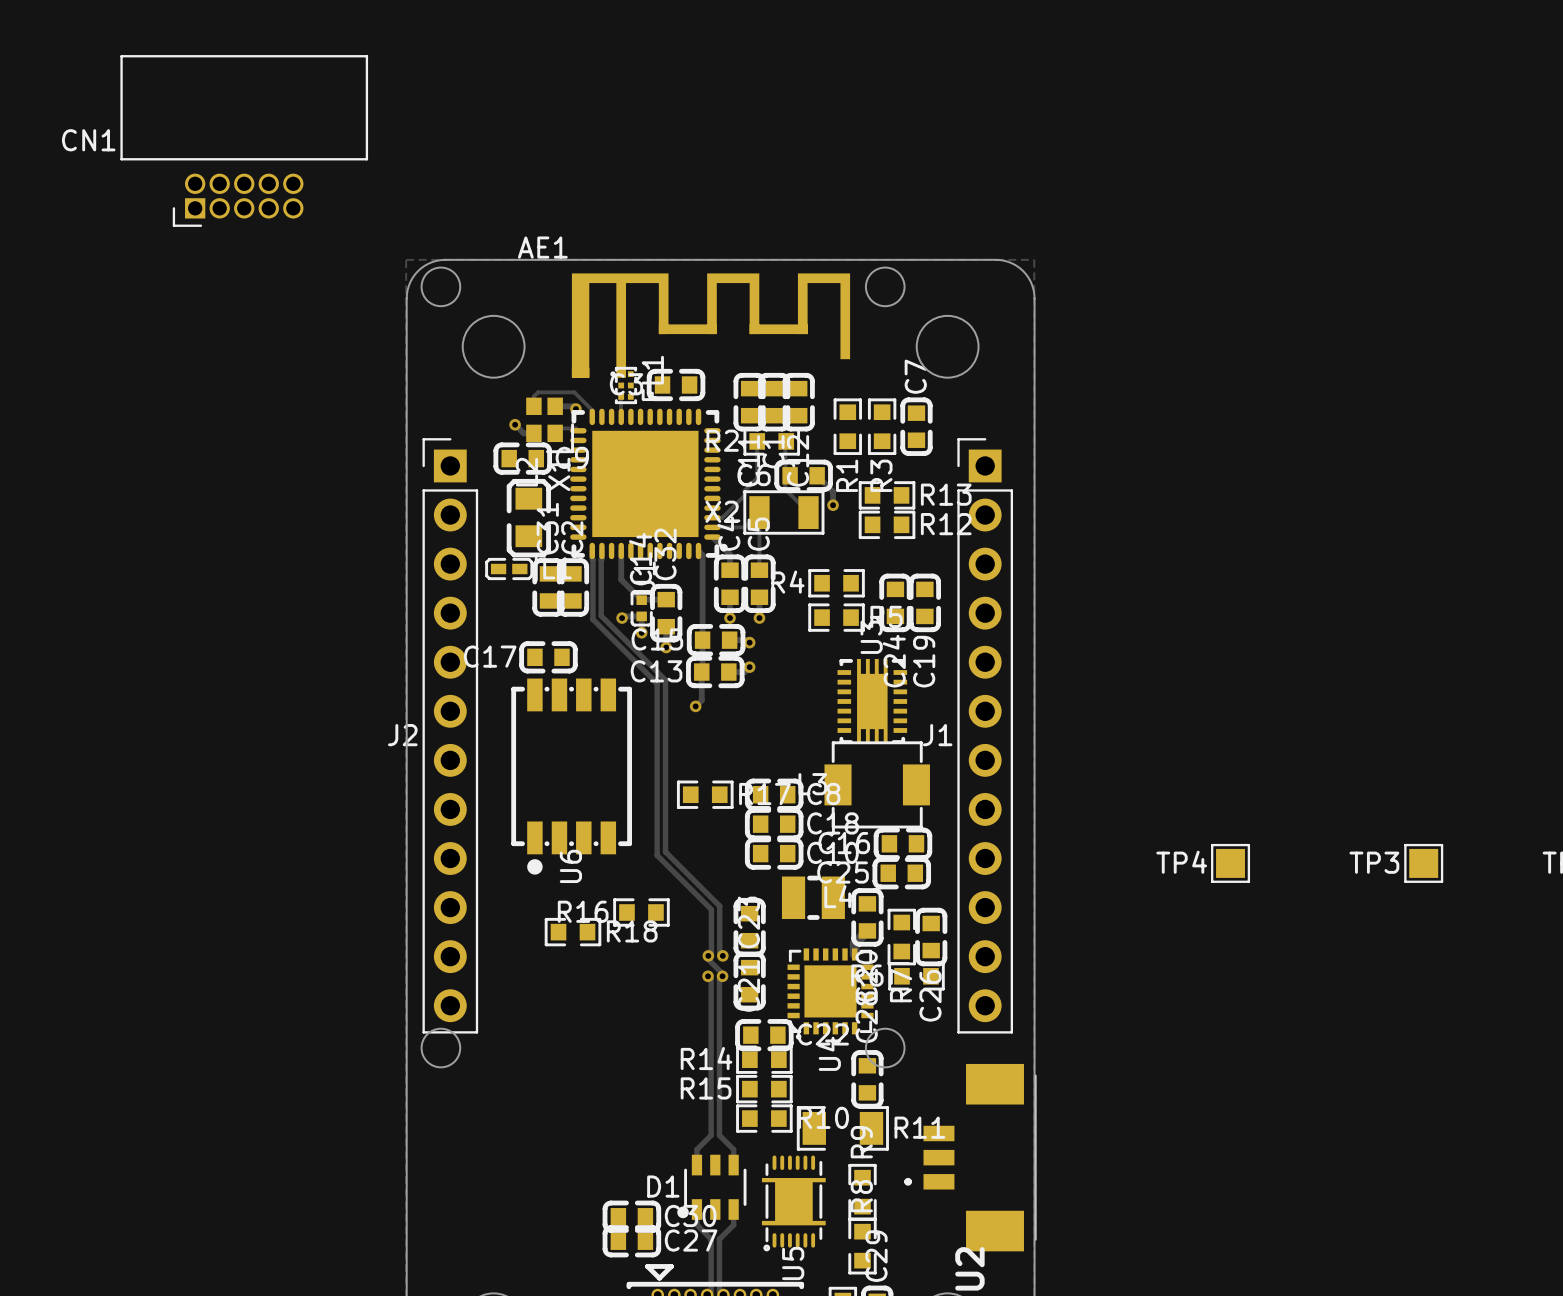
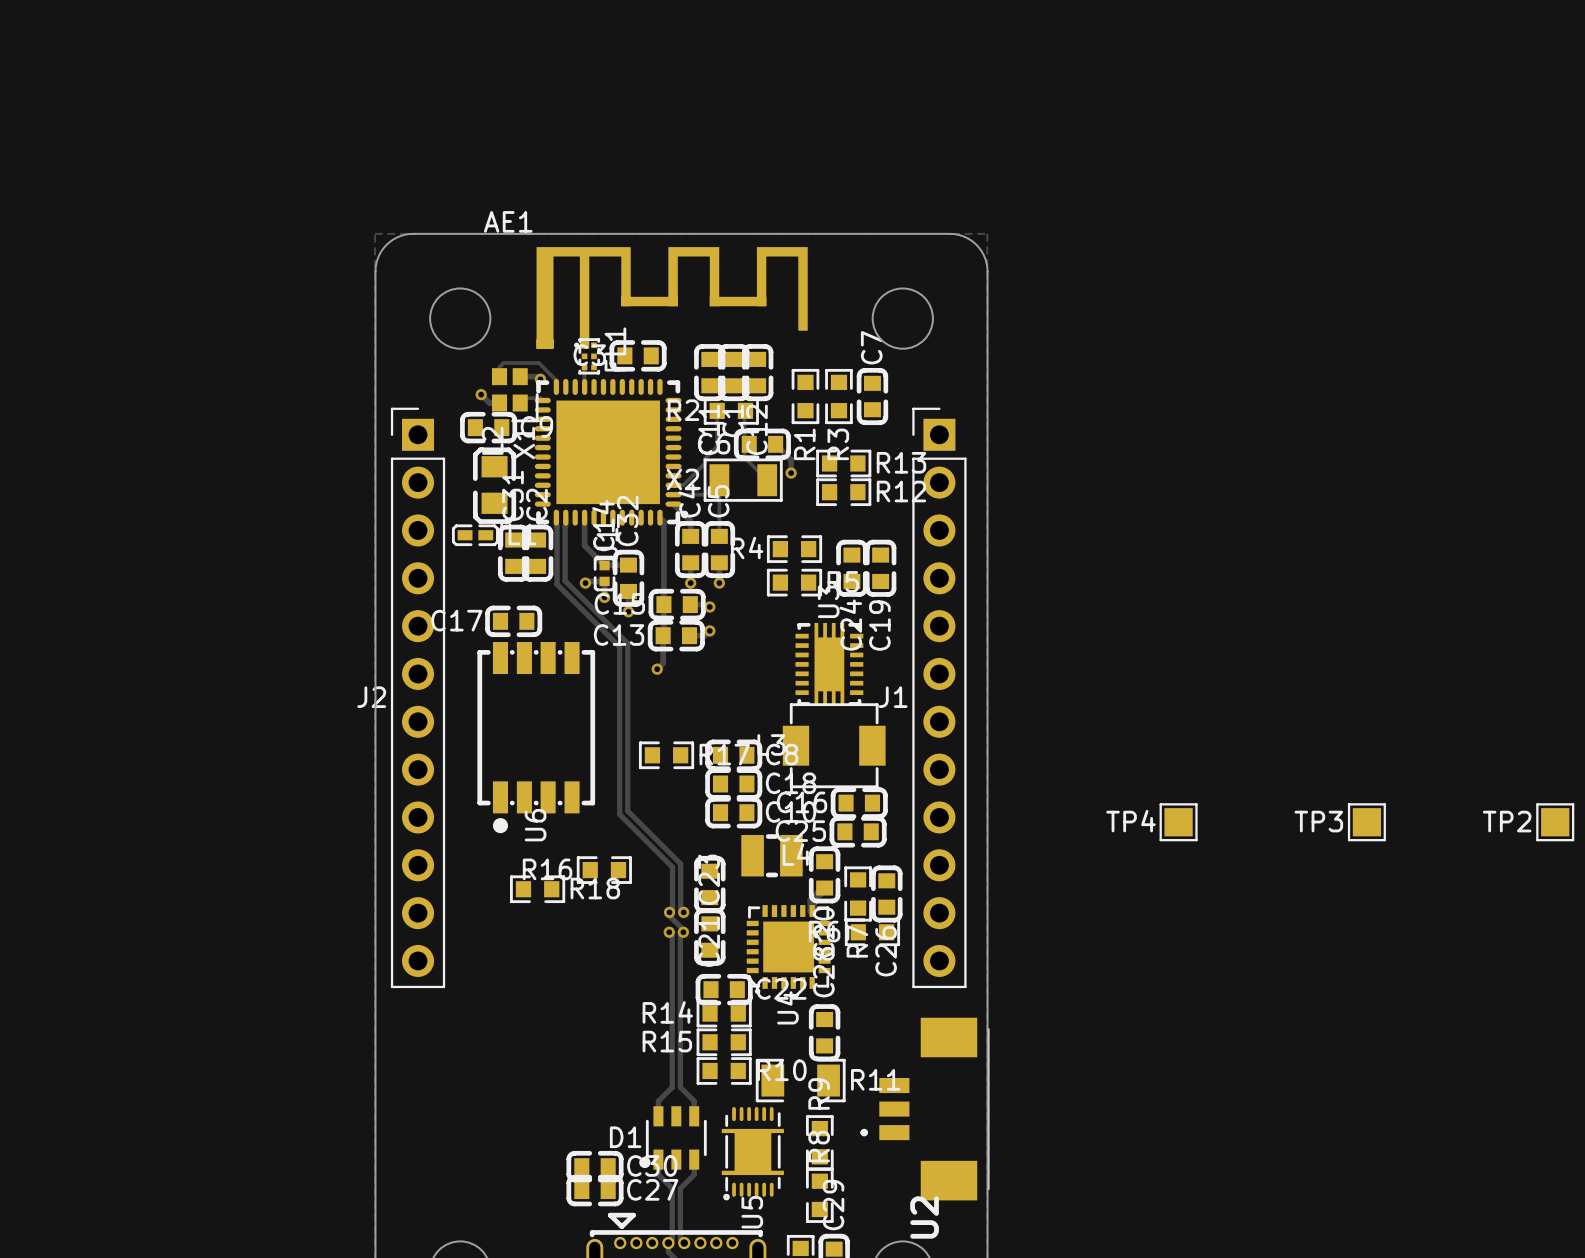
CN1: (244, 140) -> none
round board edge: [420, 266, 462, 308] -> none
round board edge: [864, 266, 906, 308] -> none
round board edge: [420, 1027, 462, 1069] -> none
round board edge: [864, 1027, 906, 1069] -> none

